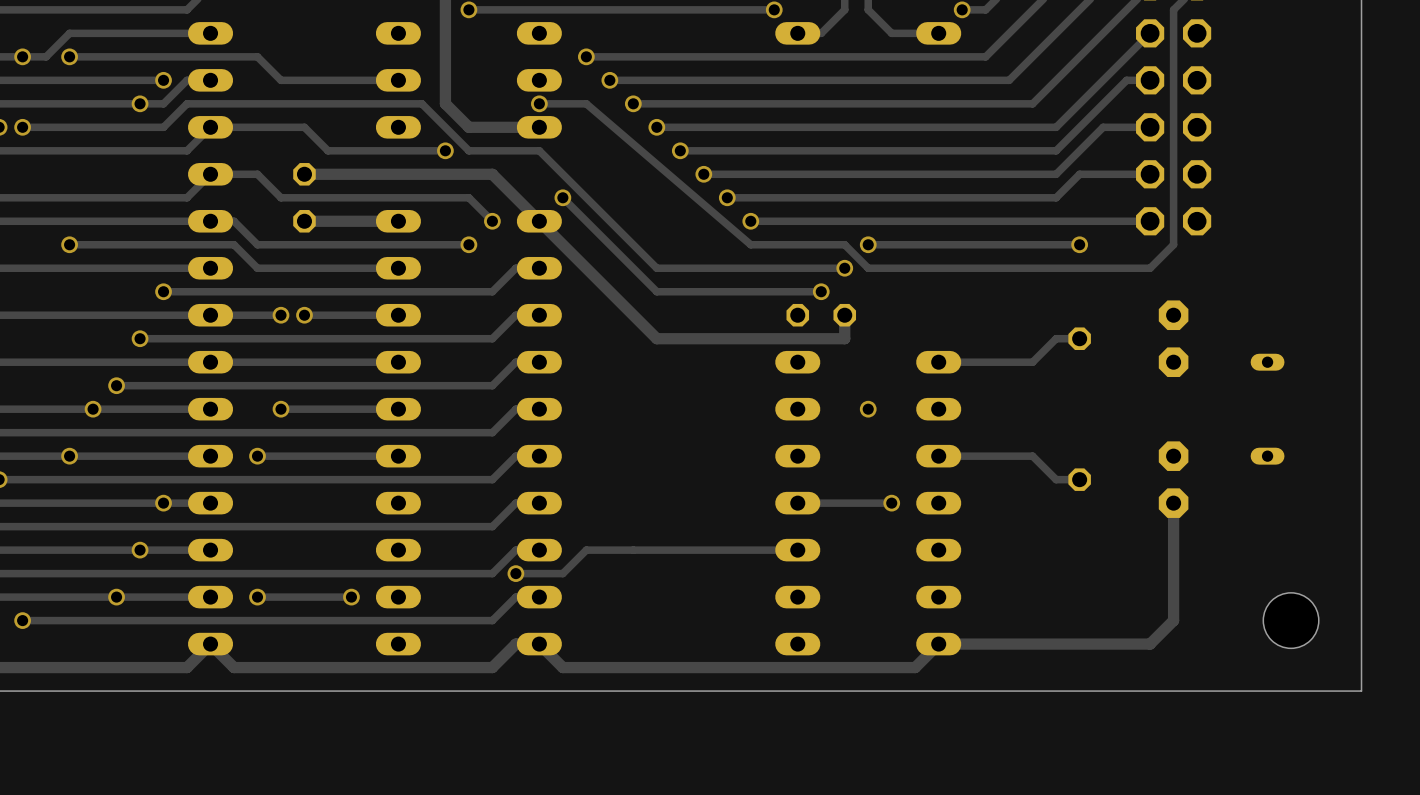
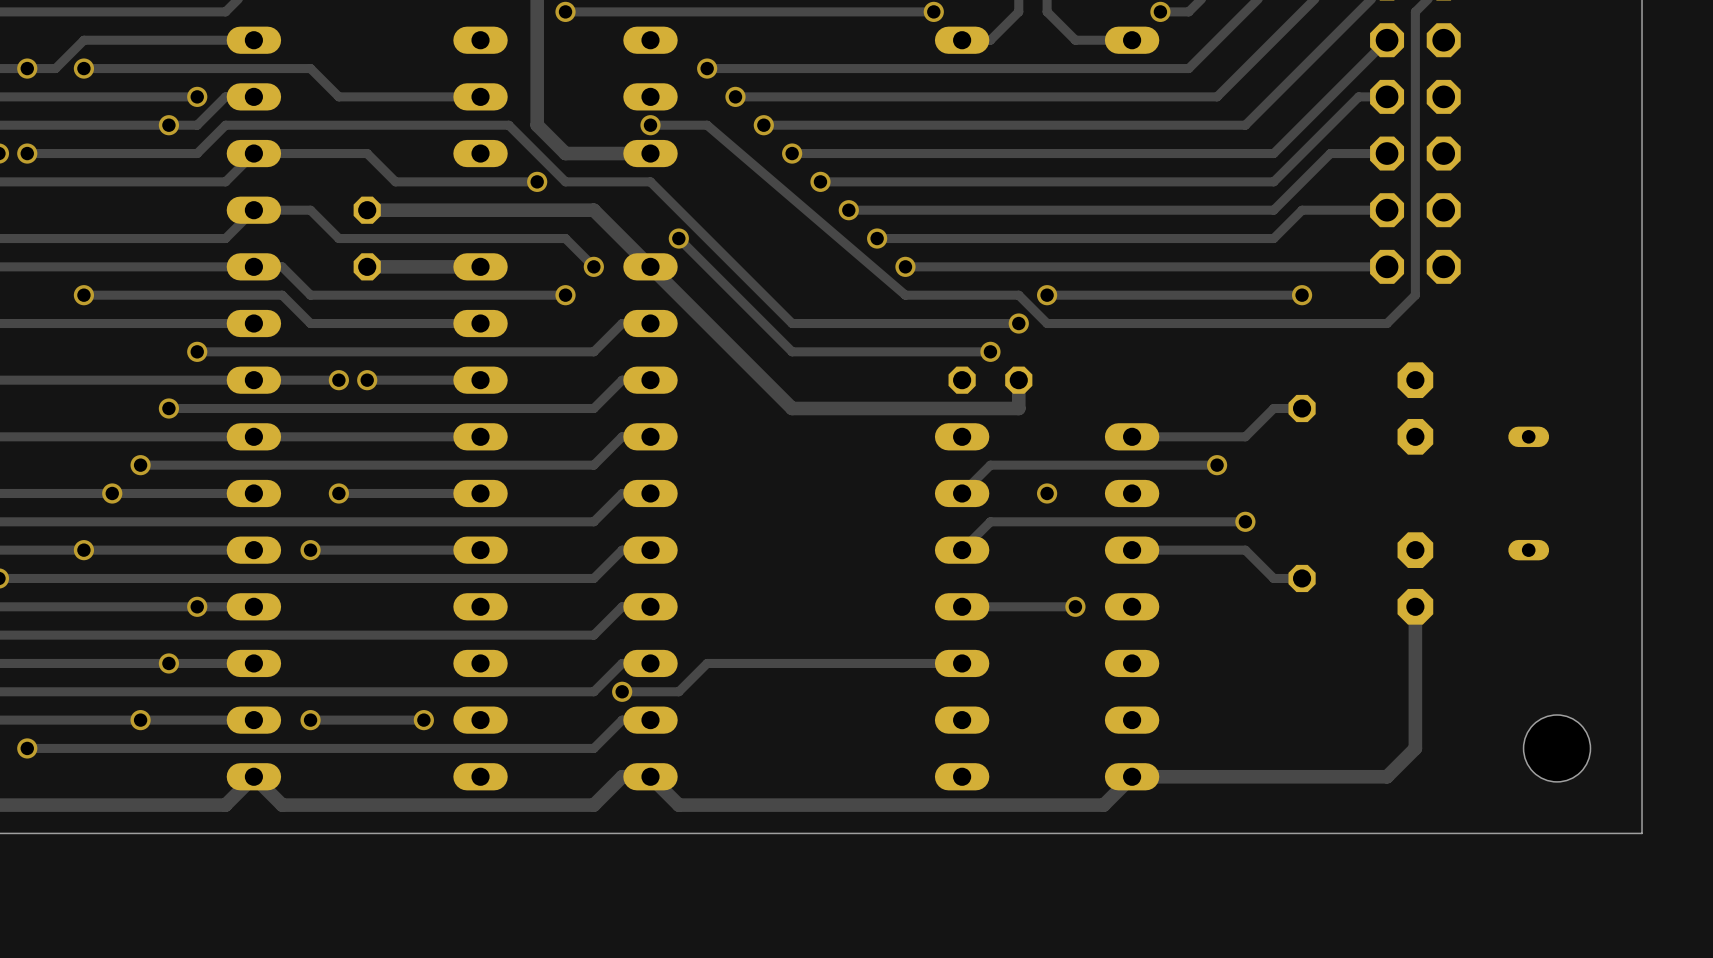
track: none -> (1217, 465) (990, 465) (962, 493)
via: none -> (1217, 465)
track: none -> (1245, 521) (990, 521) (962, 550)
via: none -> (1245, 521)

